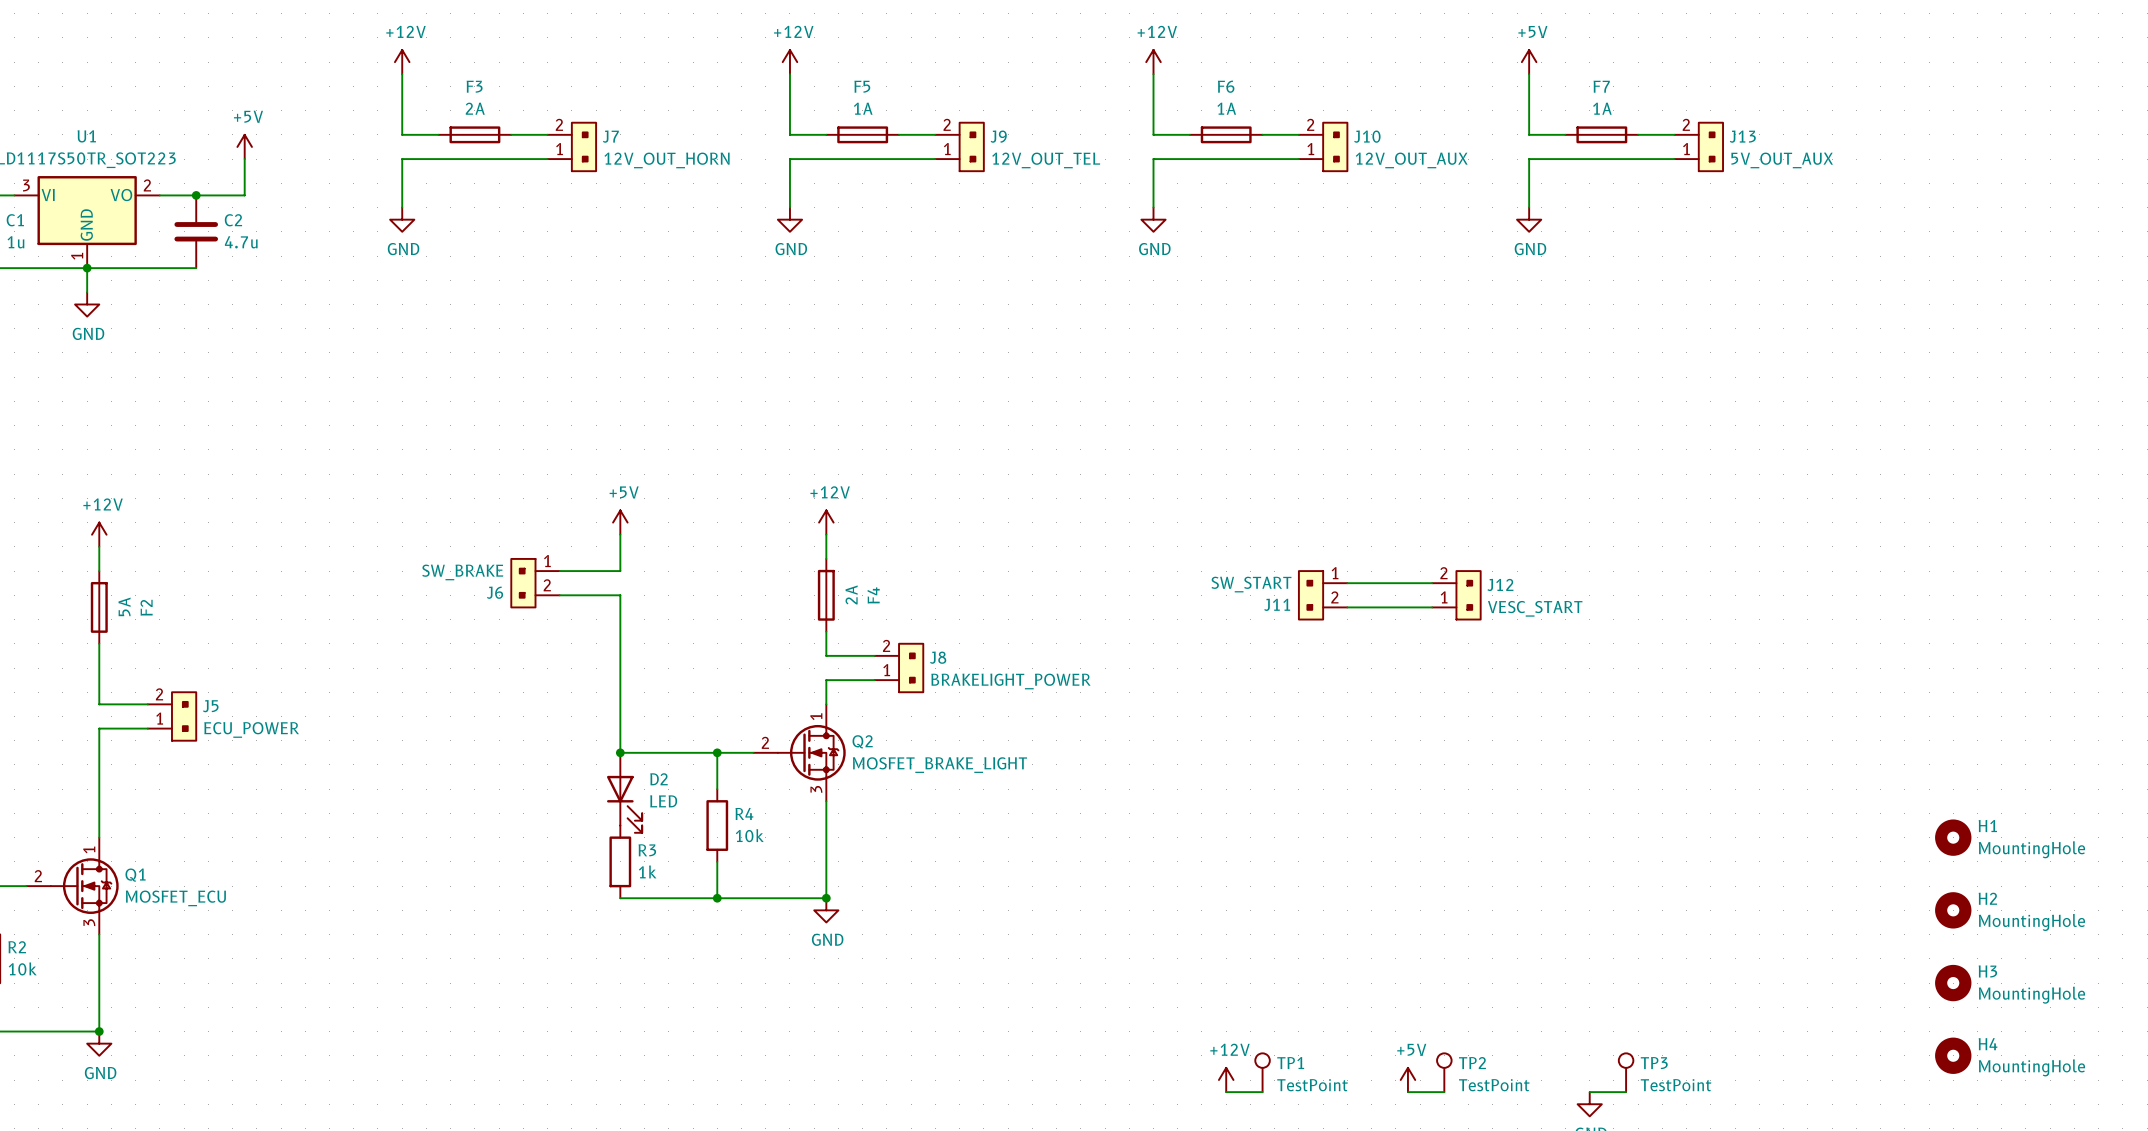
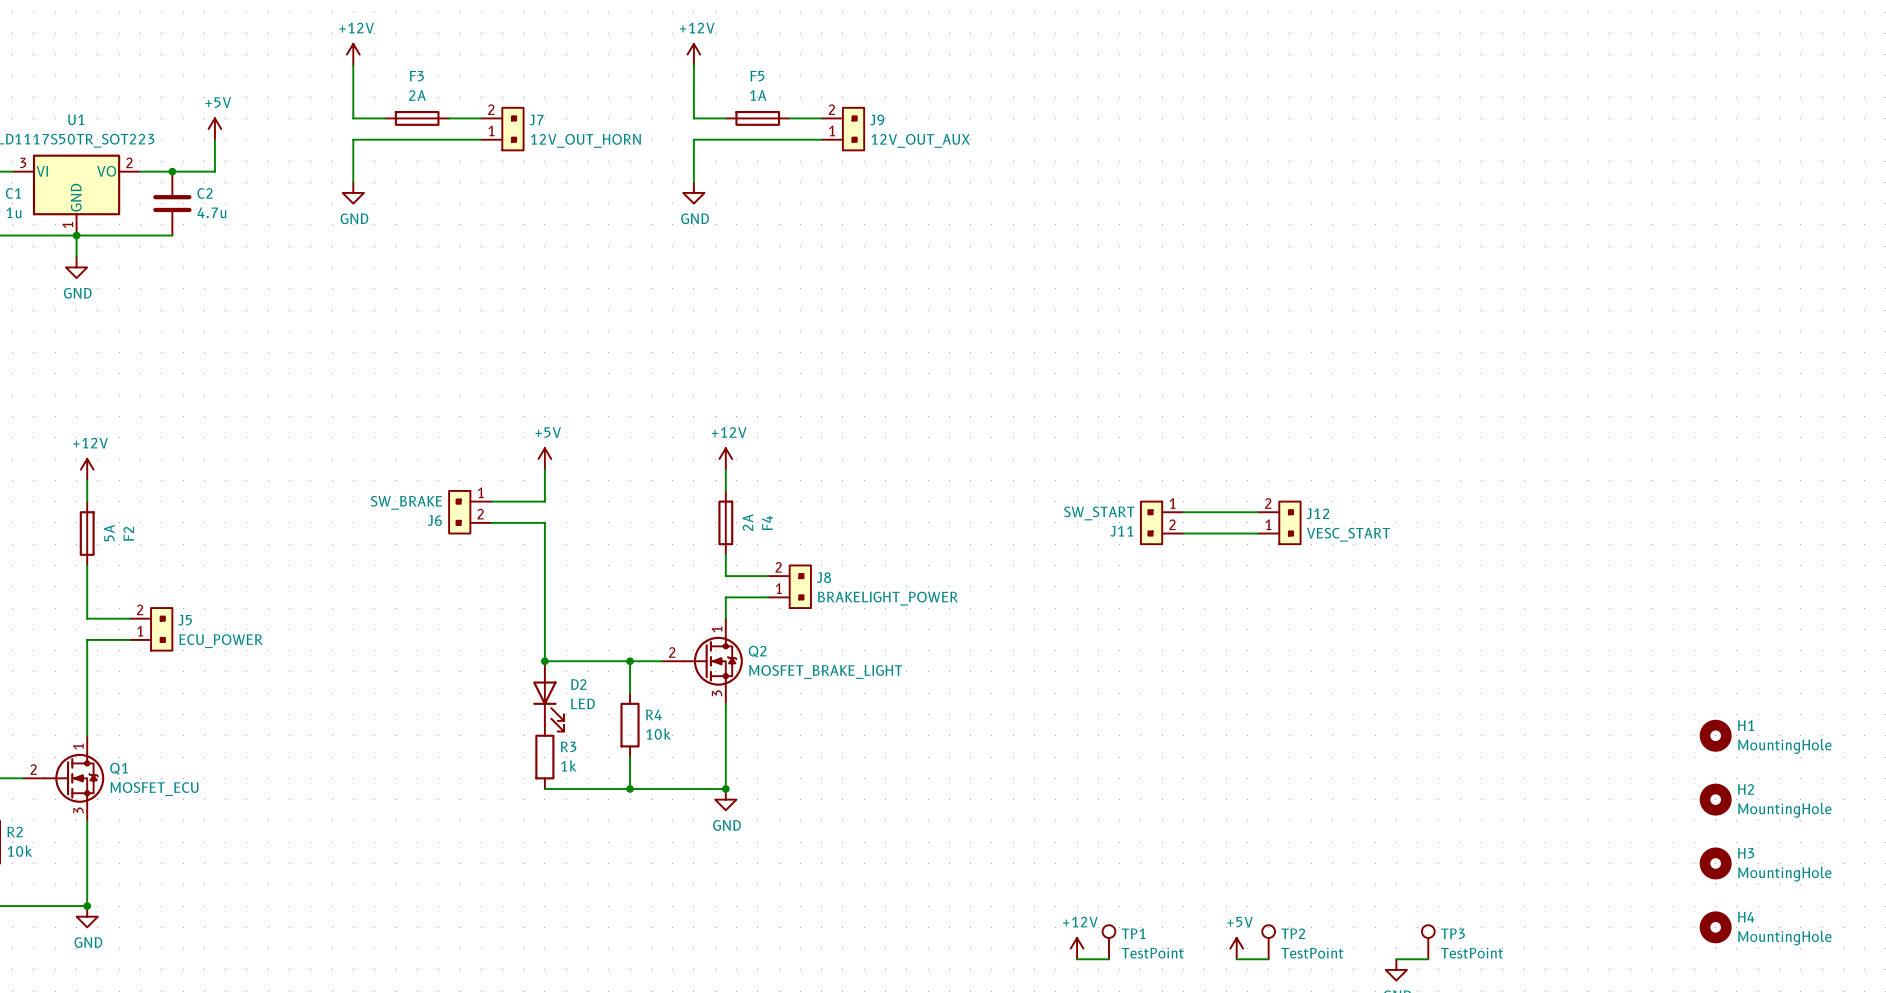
power symbol: +12V (1153, 62) -> none
power symbol: +5V (1529, 62) -> none
wire: (1153, 74) (1153, 134) (1189, 134) -> none
wire: (1529, 74) (1529, 134) (1565, 134) -> none
F6: 1A (1226, 134) -> none
wire: (1262, 134) (1298, 134) -> none
F7: 1A (1601, 134) -> none
wire: (1638, 134) (1674, 134) -> none
J10: 12V_OUT_AUX (1323, 146) -> none
J13: 5V_OUT_AUX (1698, 146) -> none
wire: (1298, 159) (1153, 159) (1153, 207) -> none
wire: (1674, 159) (1529, 159) (1529, 207) -> none
J9 value: 12V_OUT_TEL (1046, 160) -> 12V_OUT_AUX (920, 140)
power symbol: GND (1153, 219) -> none
power symbol: GND (1529, 219) -> none

